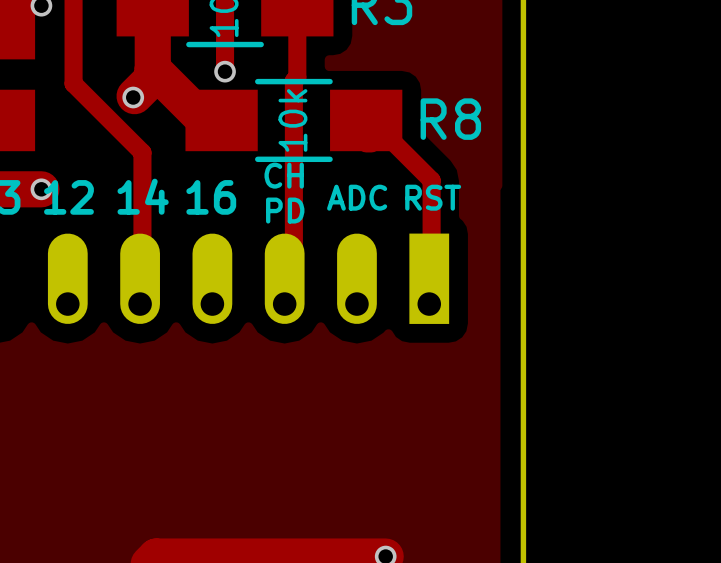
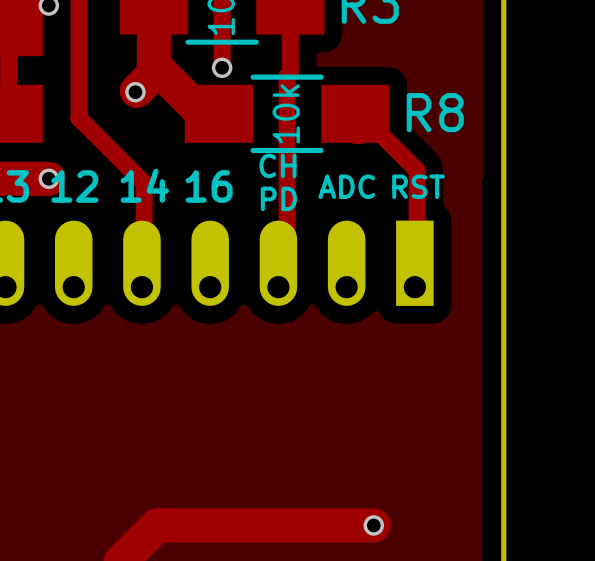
track: (73, 83) (142, 152) (142, 193) -> (79, 118) (144, 183)
track: none -> (79, 79) (79, 118)

